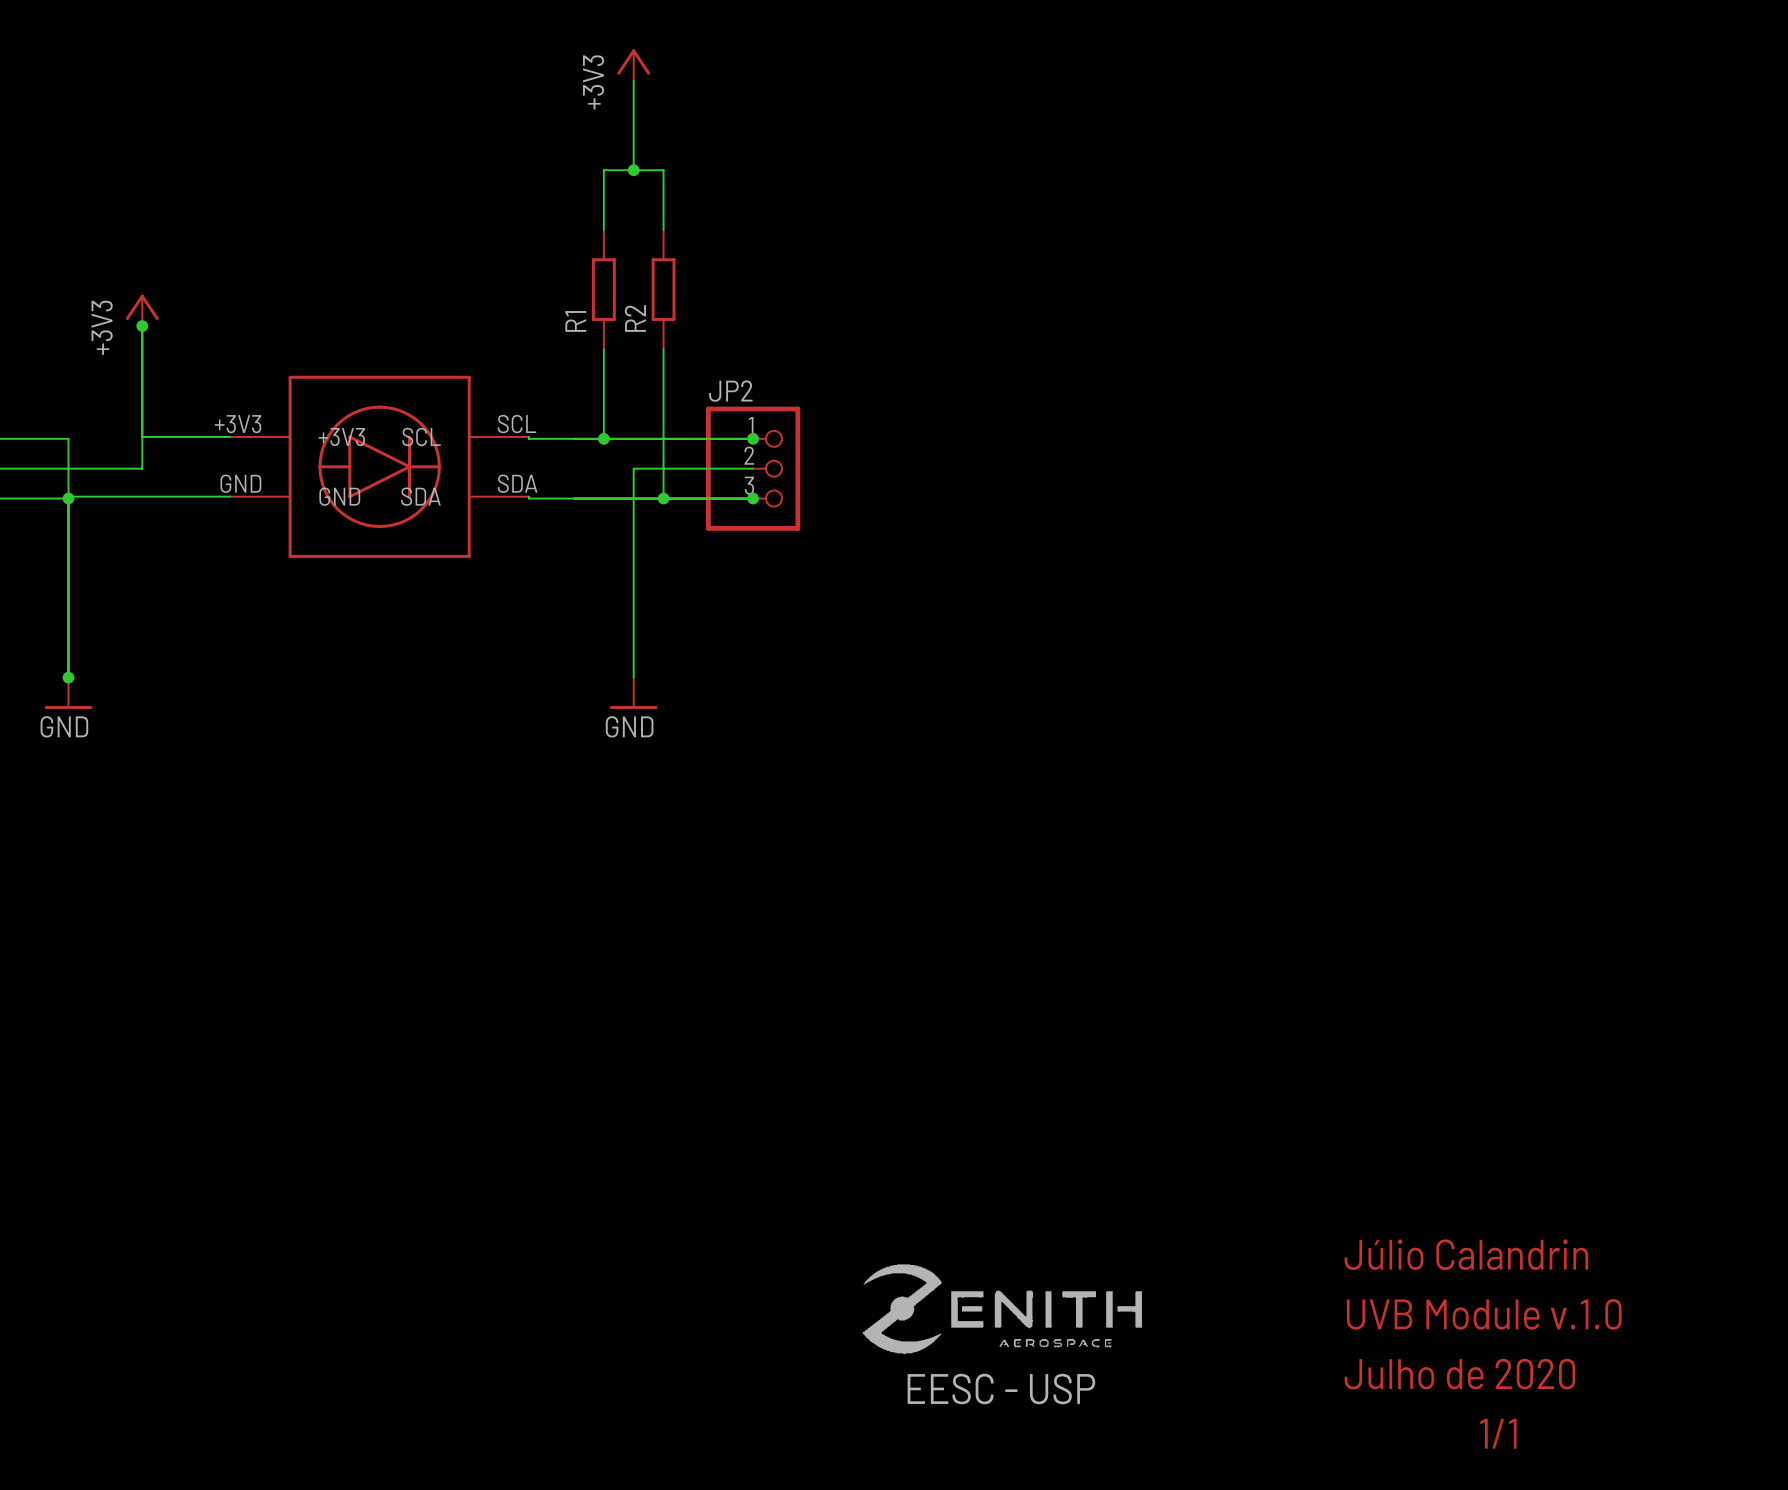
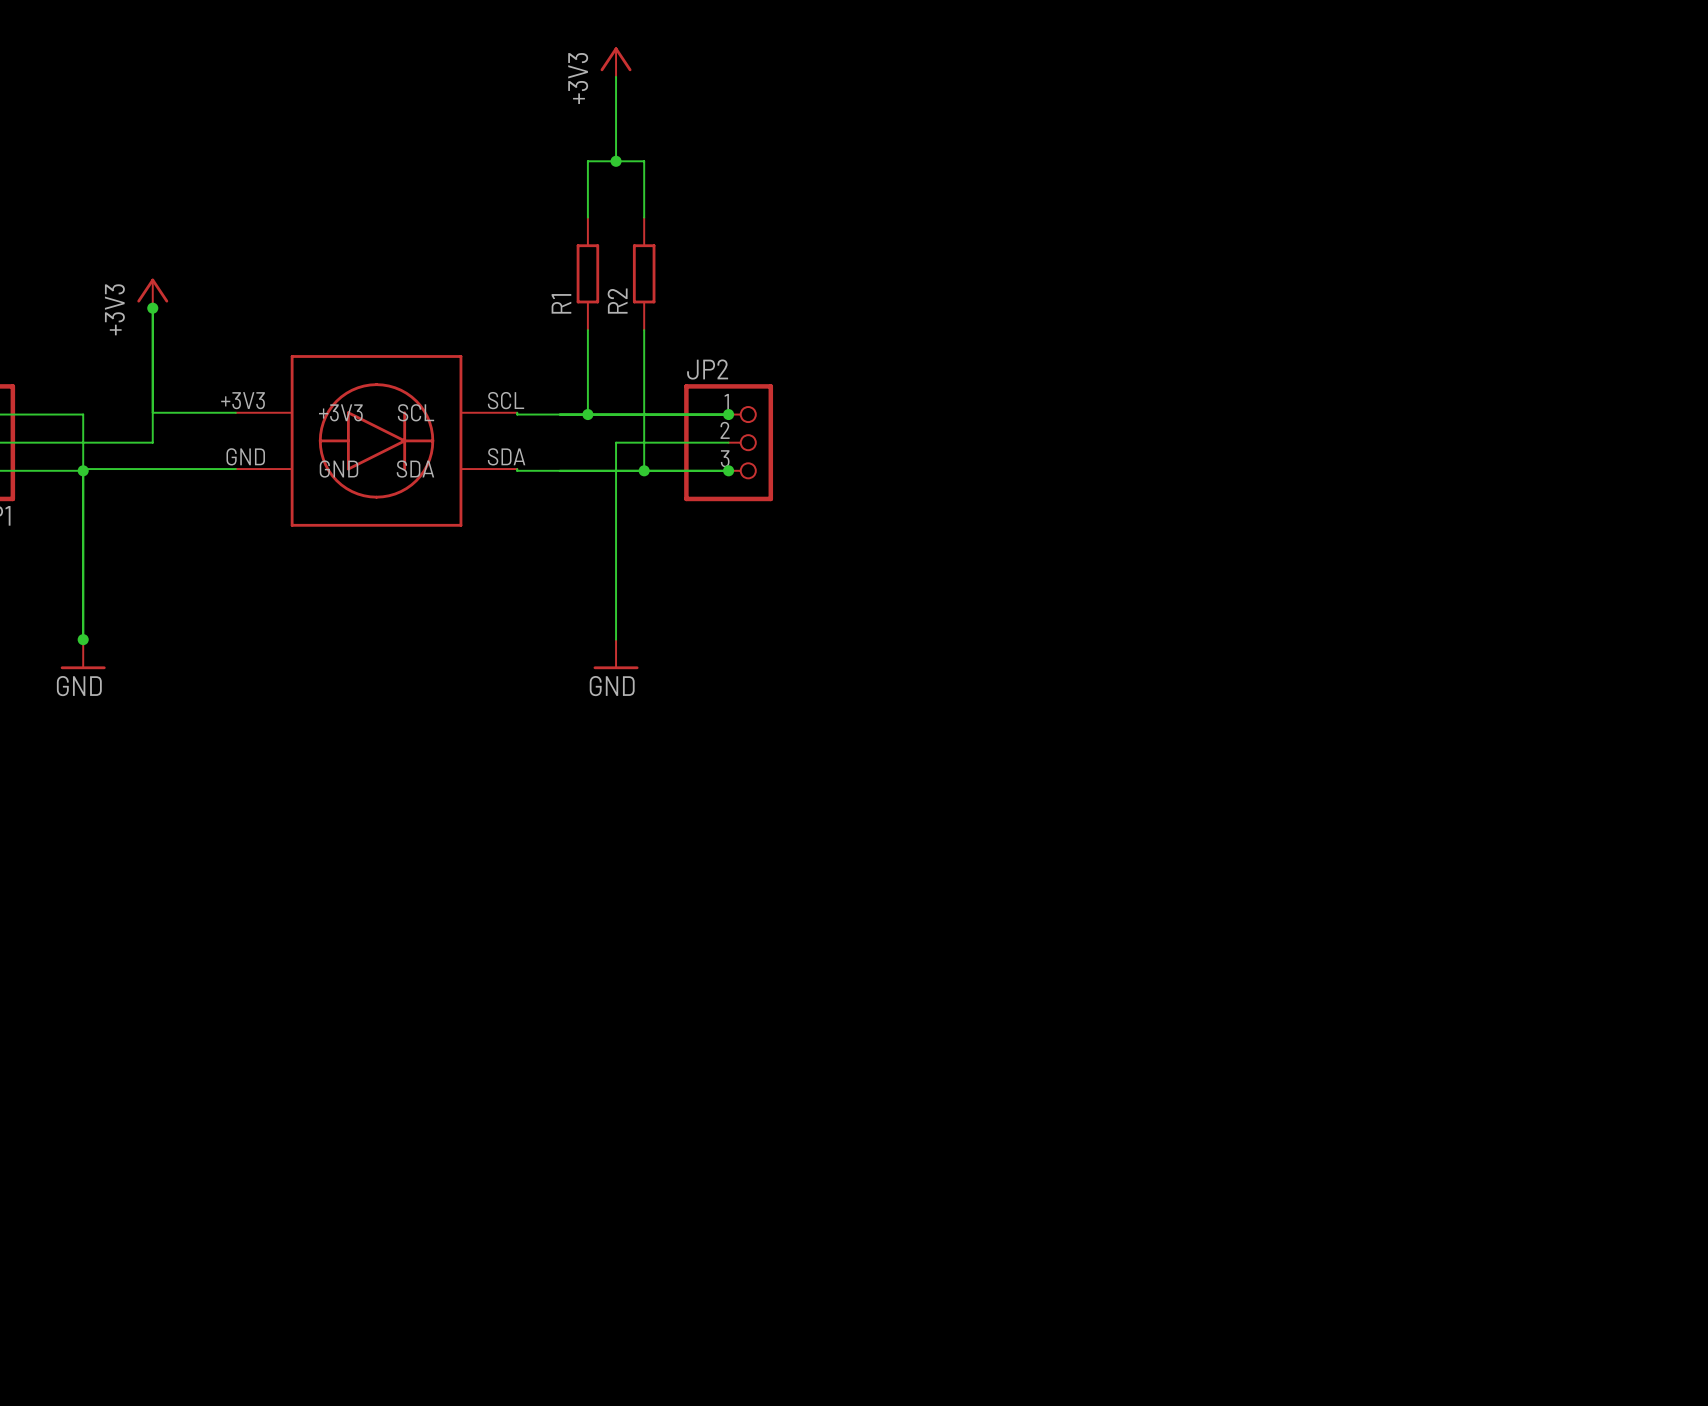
text: Júlio Calandrin (1466, 1254) -> none
drawing: [862, 1264, 1142, 1354] -> none
text: UVB Module v.1.0 (1484, 1314) -> none
text: Julho de 2020 (1459, 1374) -> none
text: EESC - USP (1001, 1389) -> none
text: 1/1 (1498, 1433) -> none

